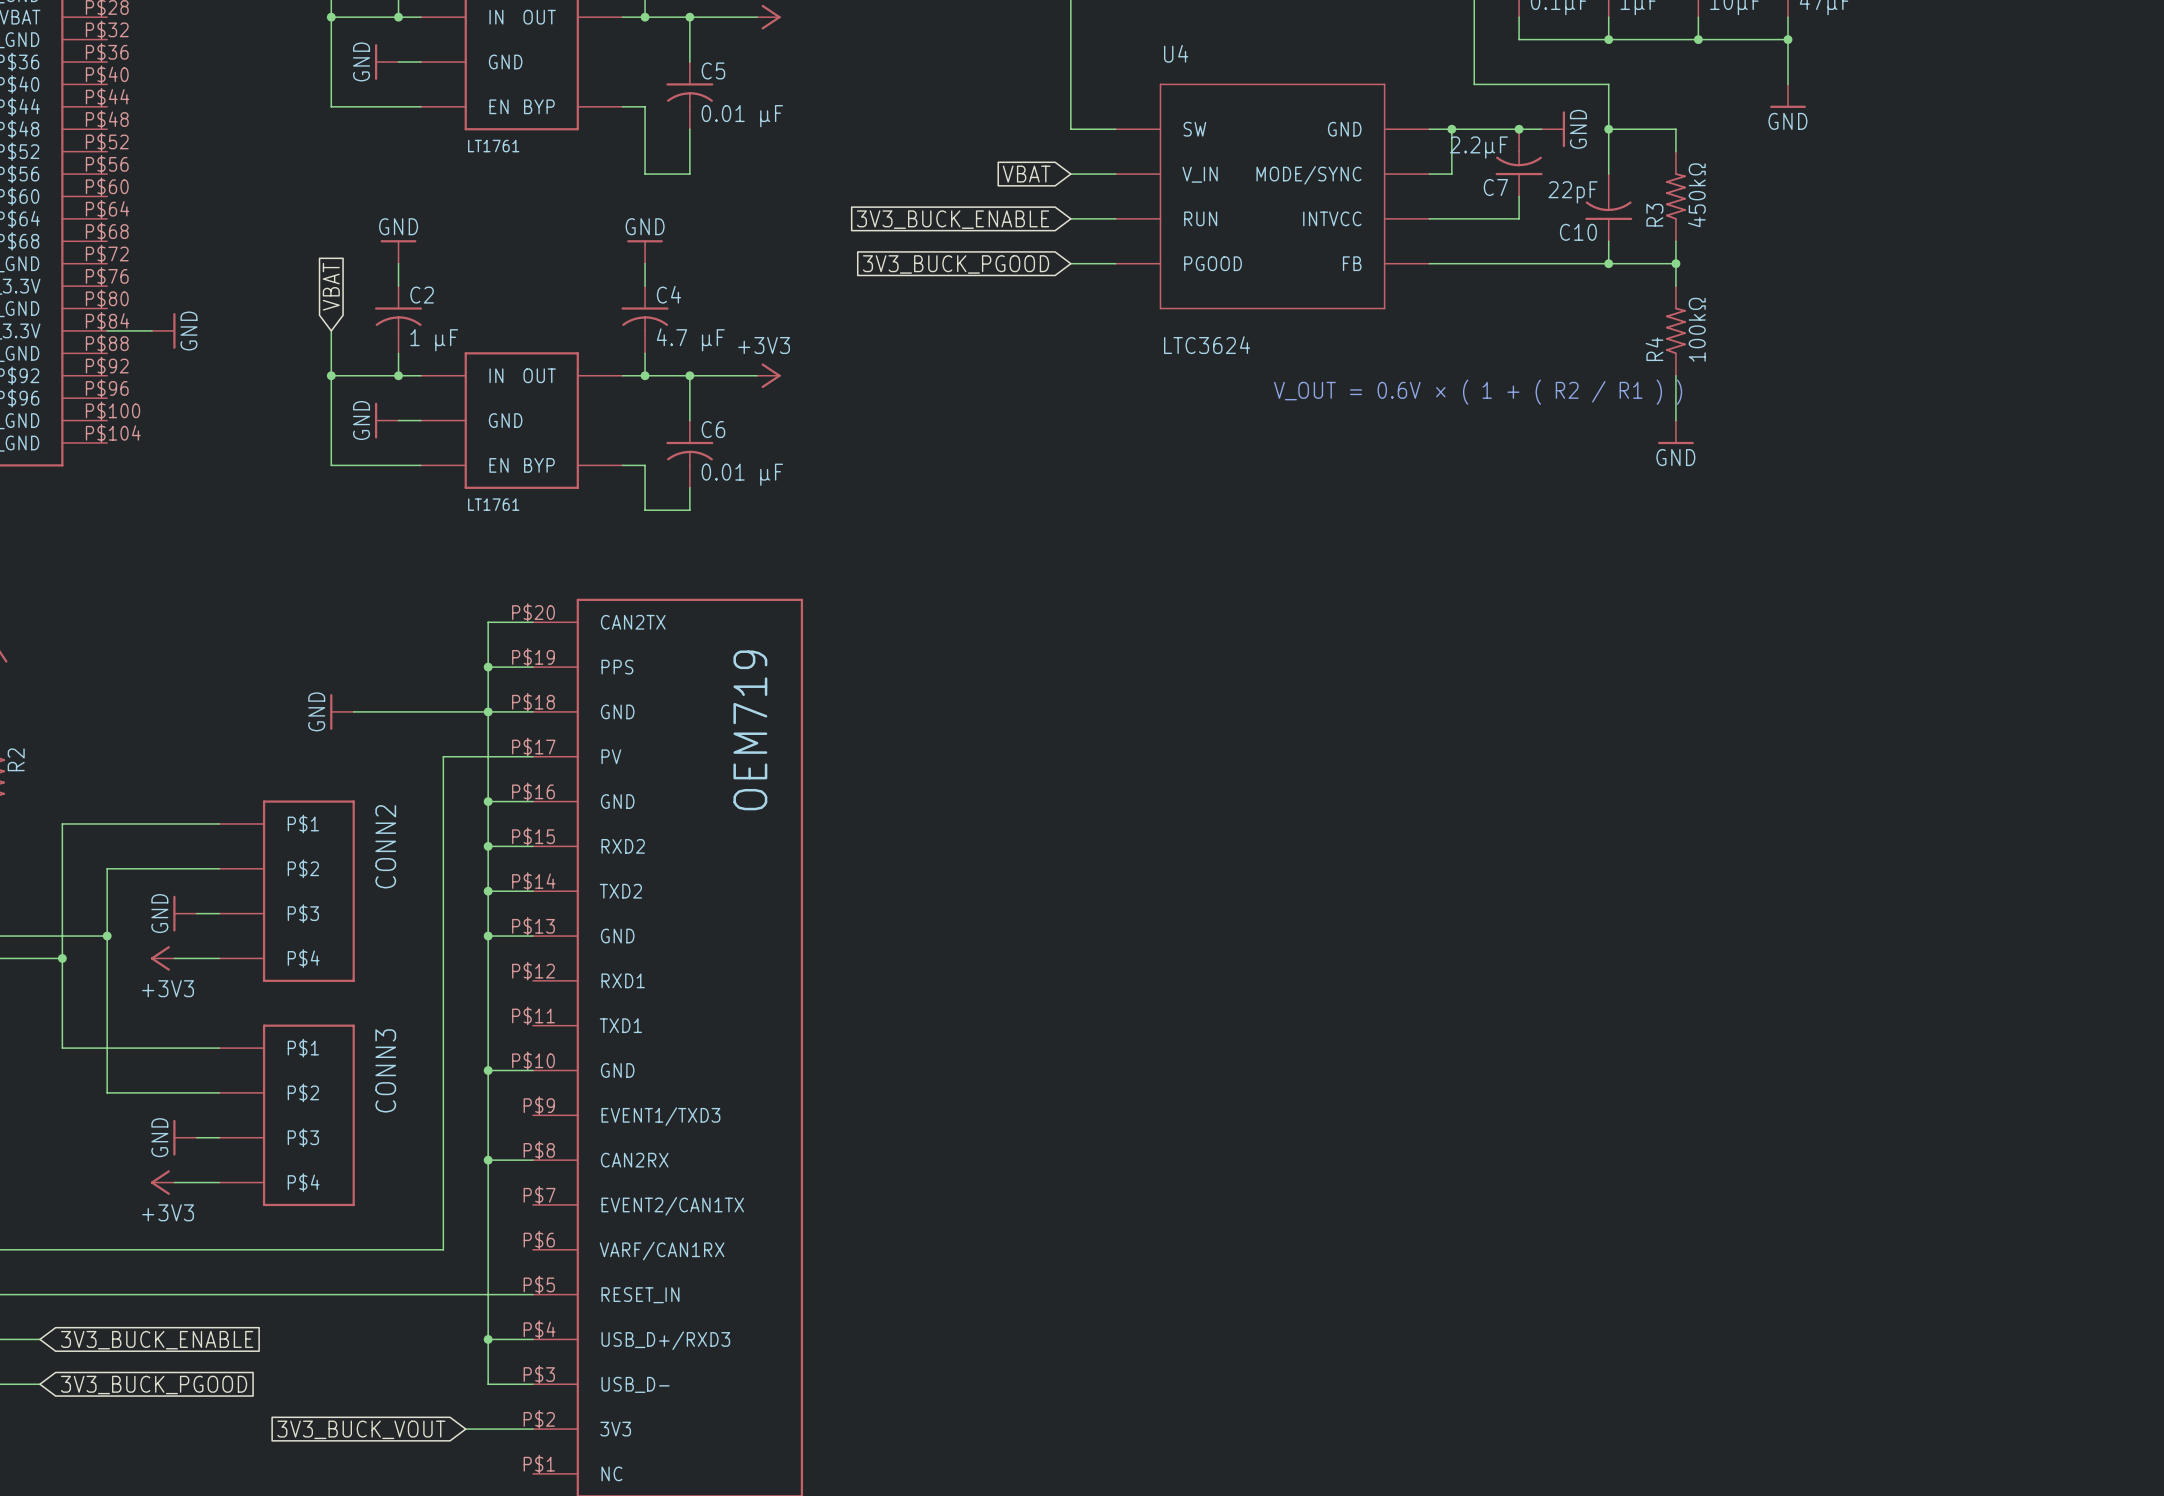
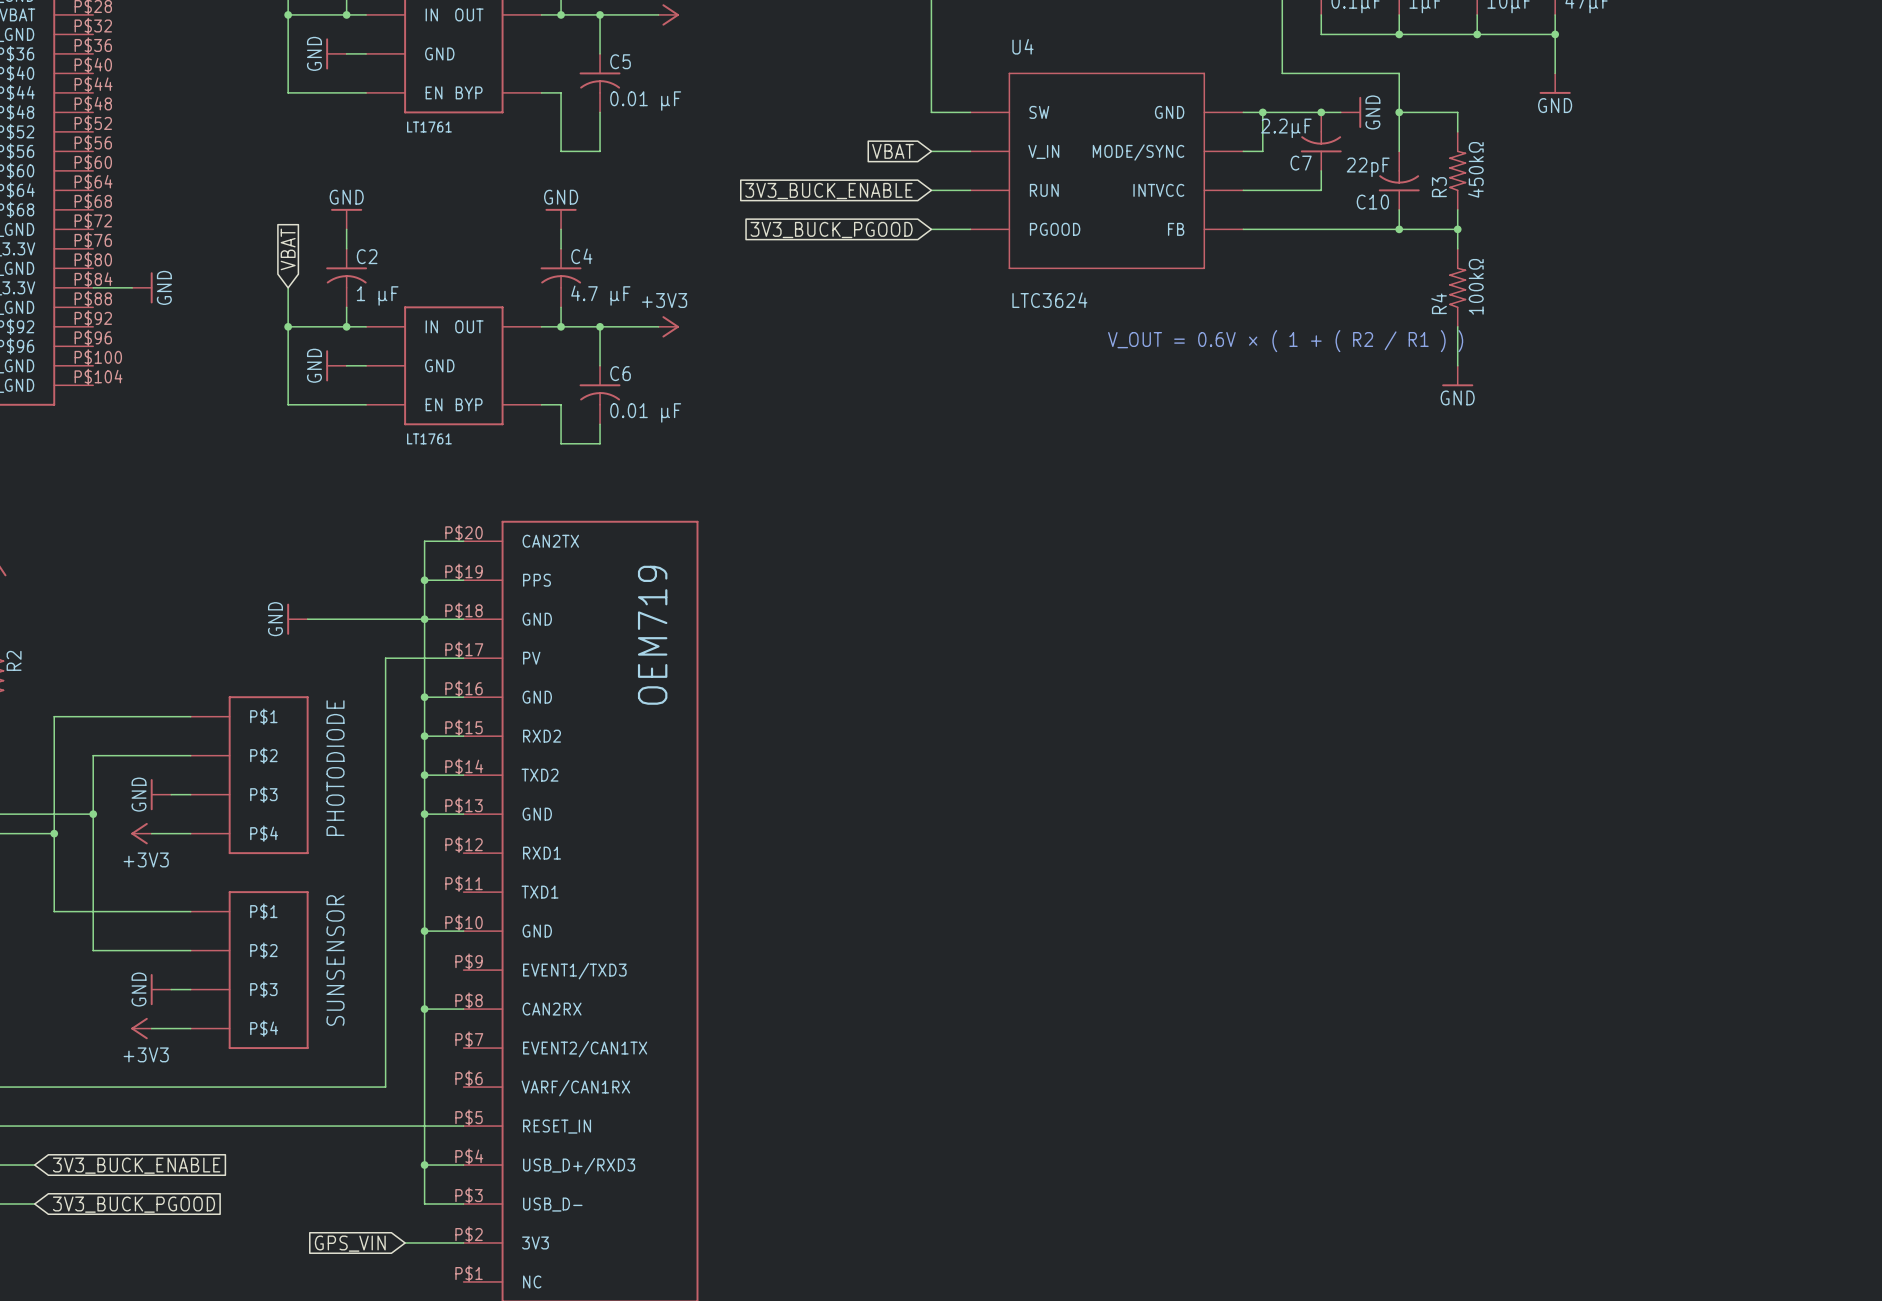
CONN2 name: CONN2 (385, 846) -> PHOTODIODE (335, 768)
CONN3 name: CONN3 (385, 1070) -> SUNSENSOR (335, 960)
global label: 3V3_BUCK_VOUT (361, 1429) -> GPS_VIN (350, 1243)

